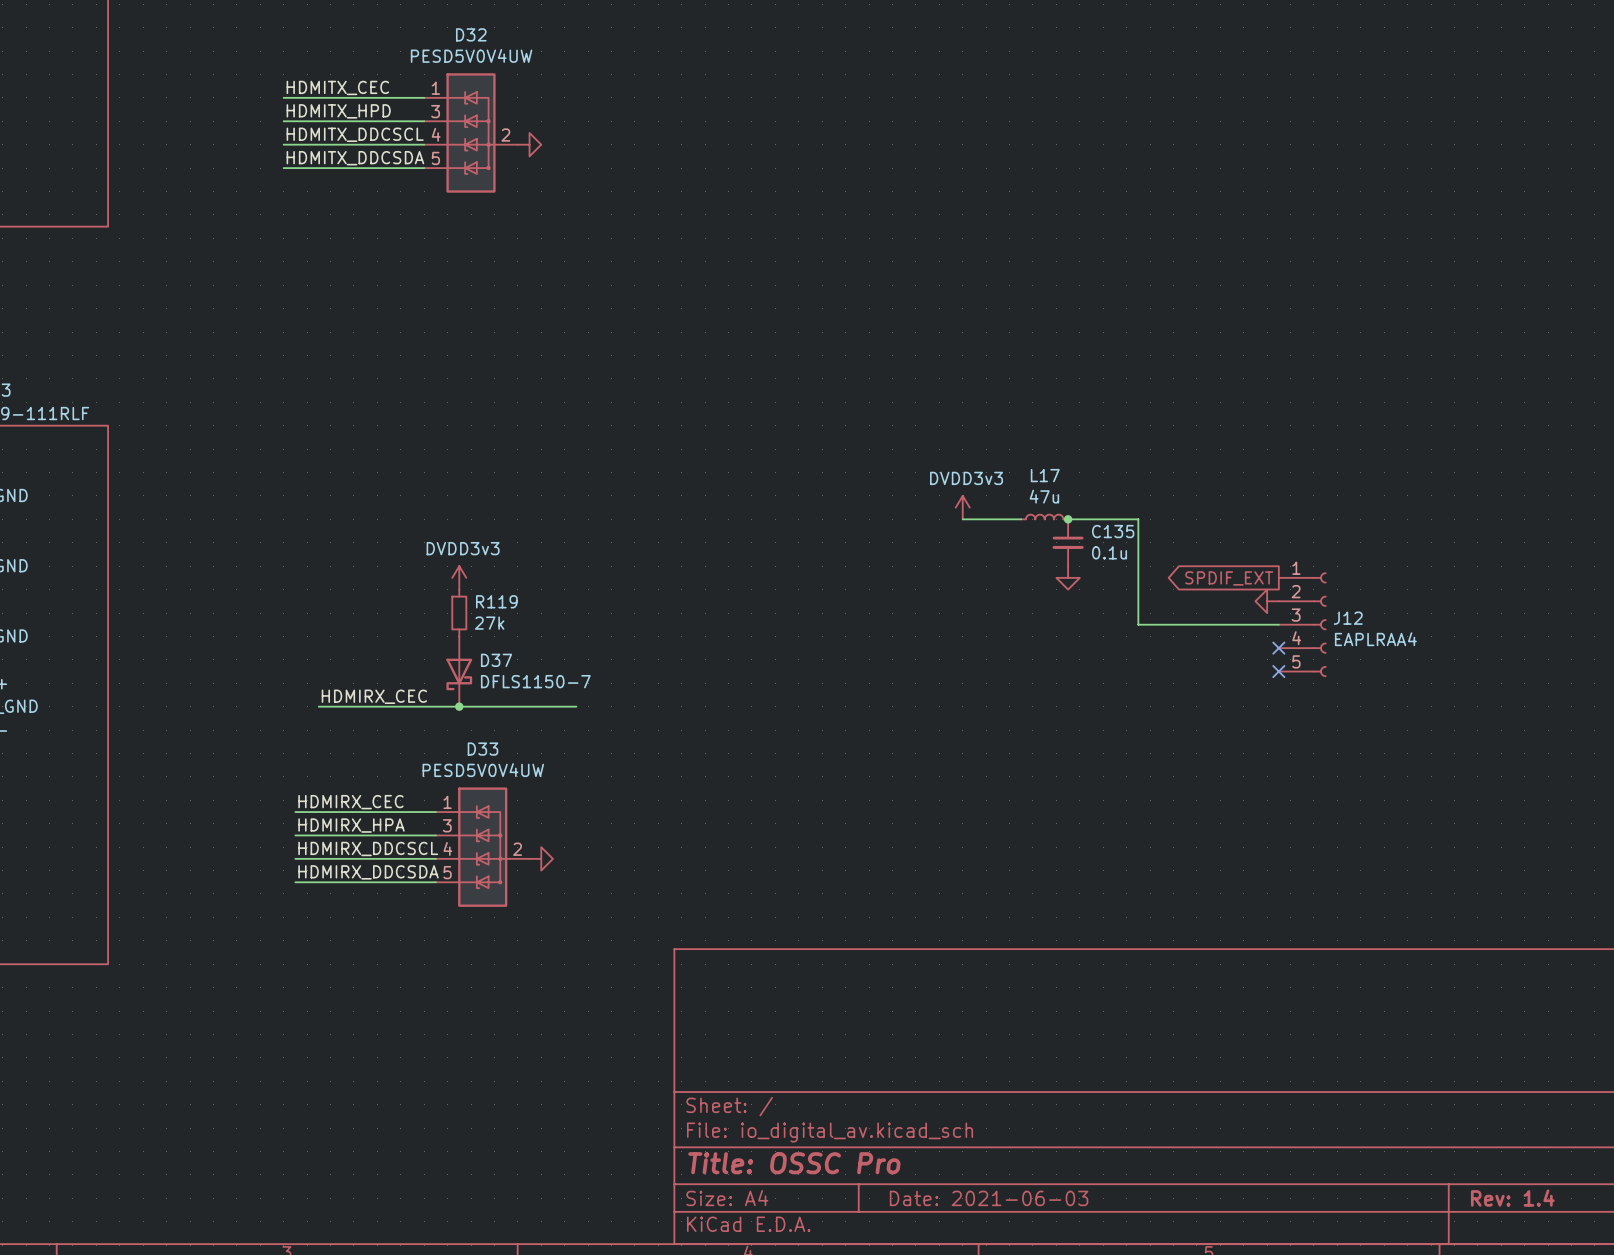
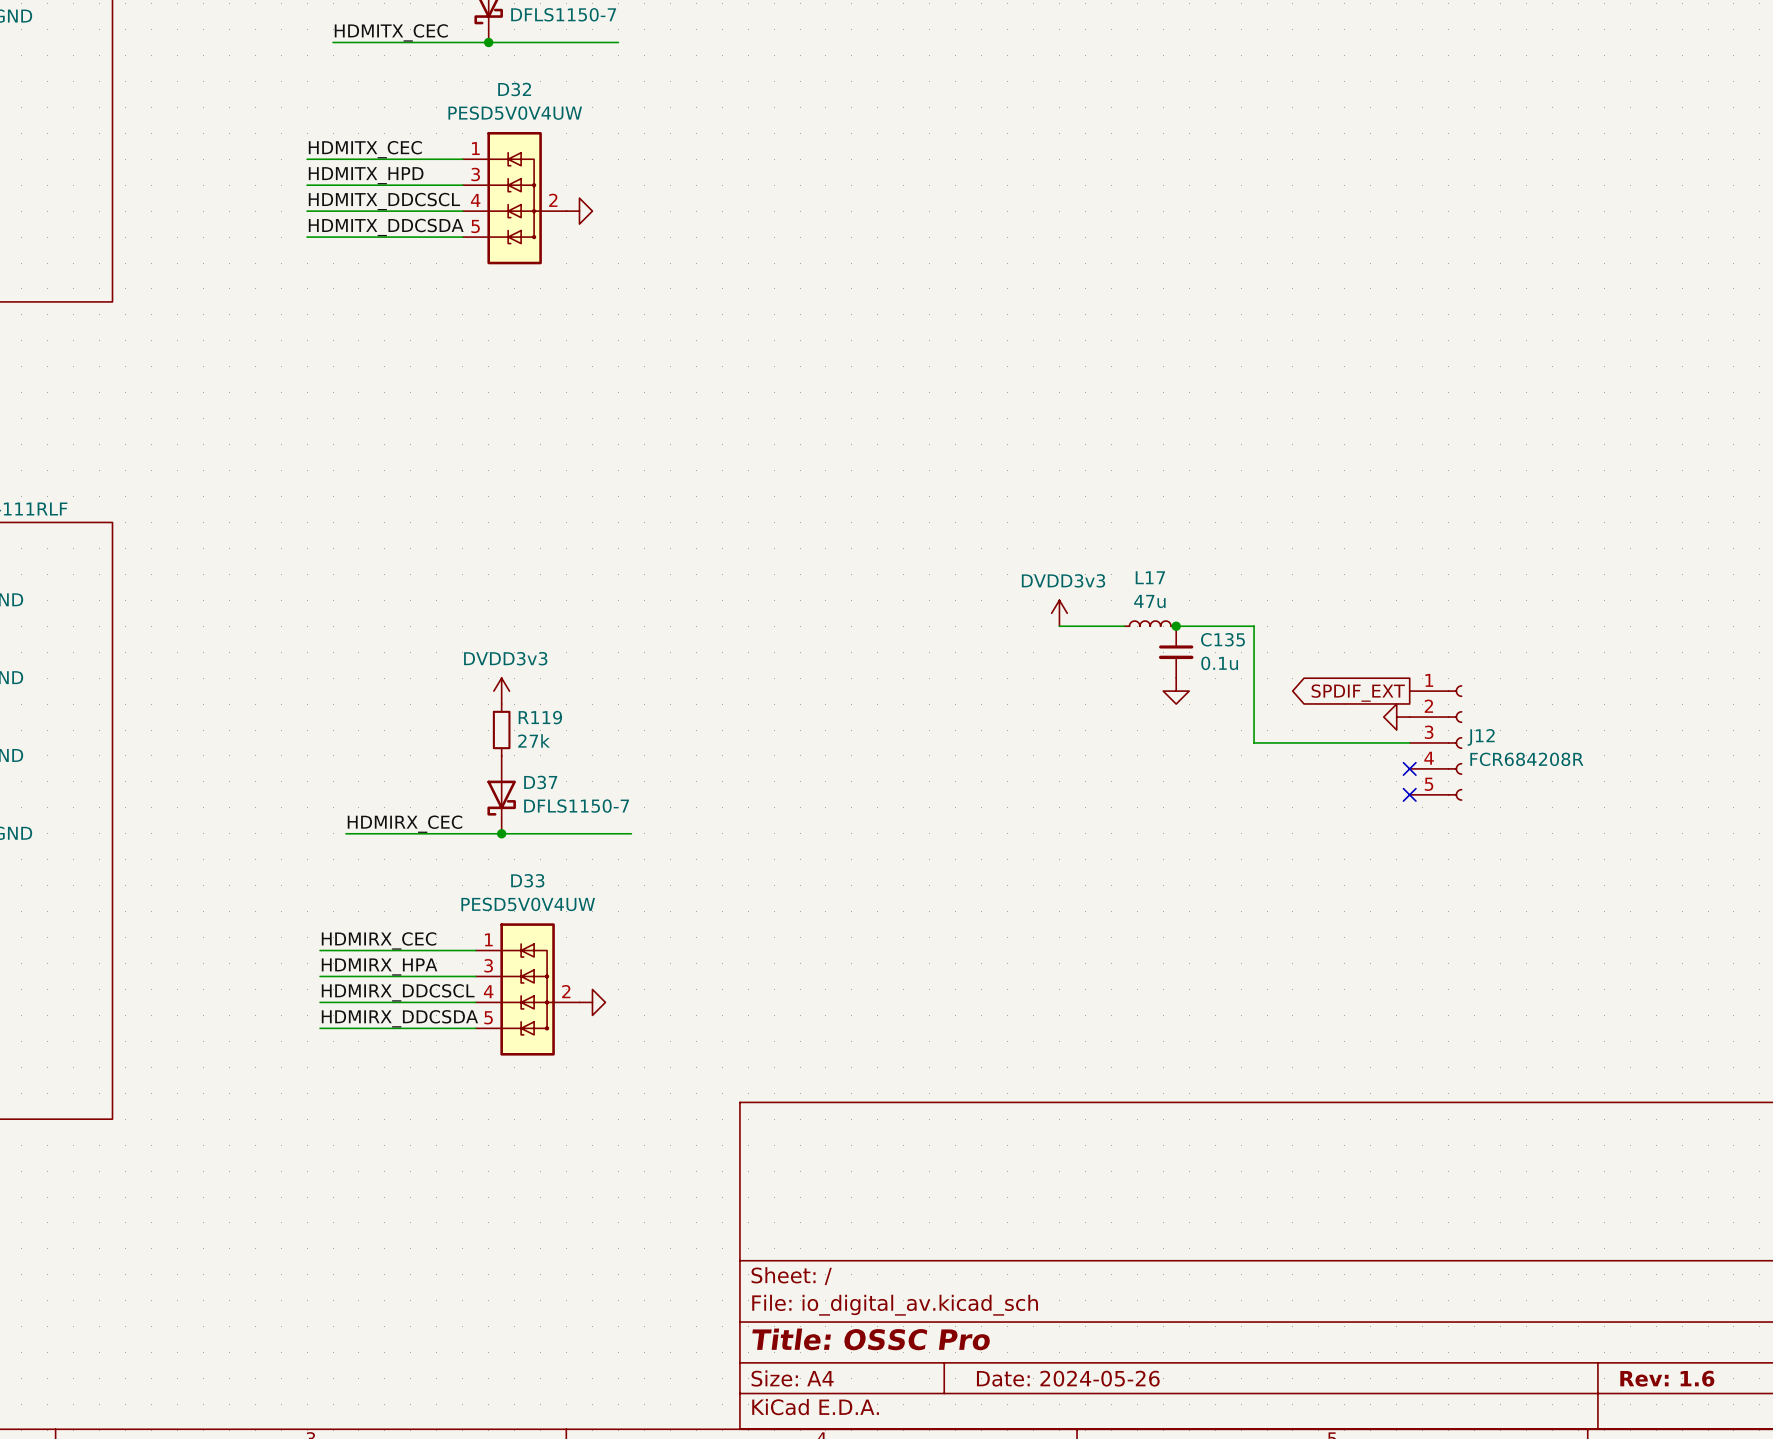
J12 value: EAPLRAA4 (1375, 639) -> FCR684208R (1526, 759)
title block: Date: 2021-06-03 (989, 1198) -> Date: 2024-05-26 (1068, 1378)
title block: Rev: 1.4 (1512, 1198) -> Rev: 1.6 (1667, 1378)

